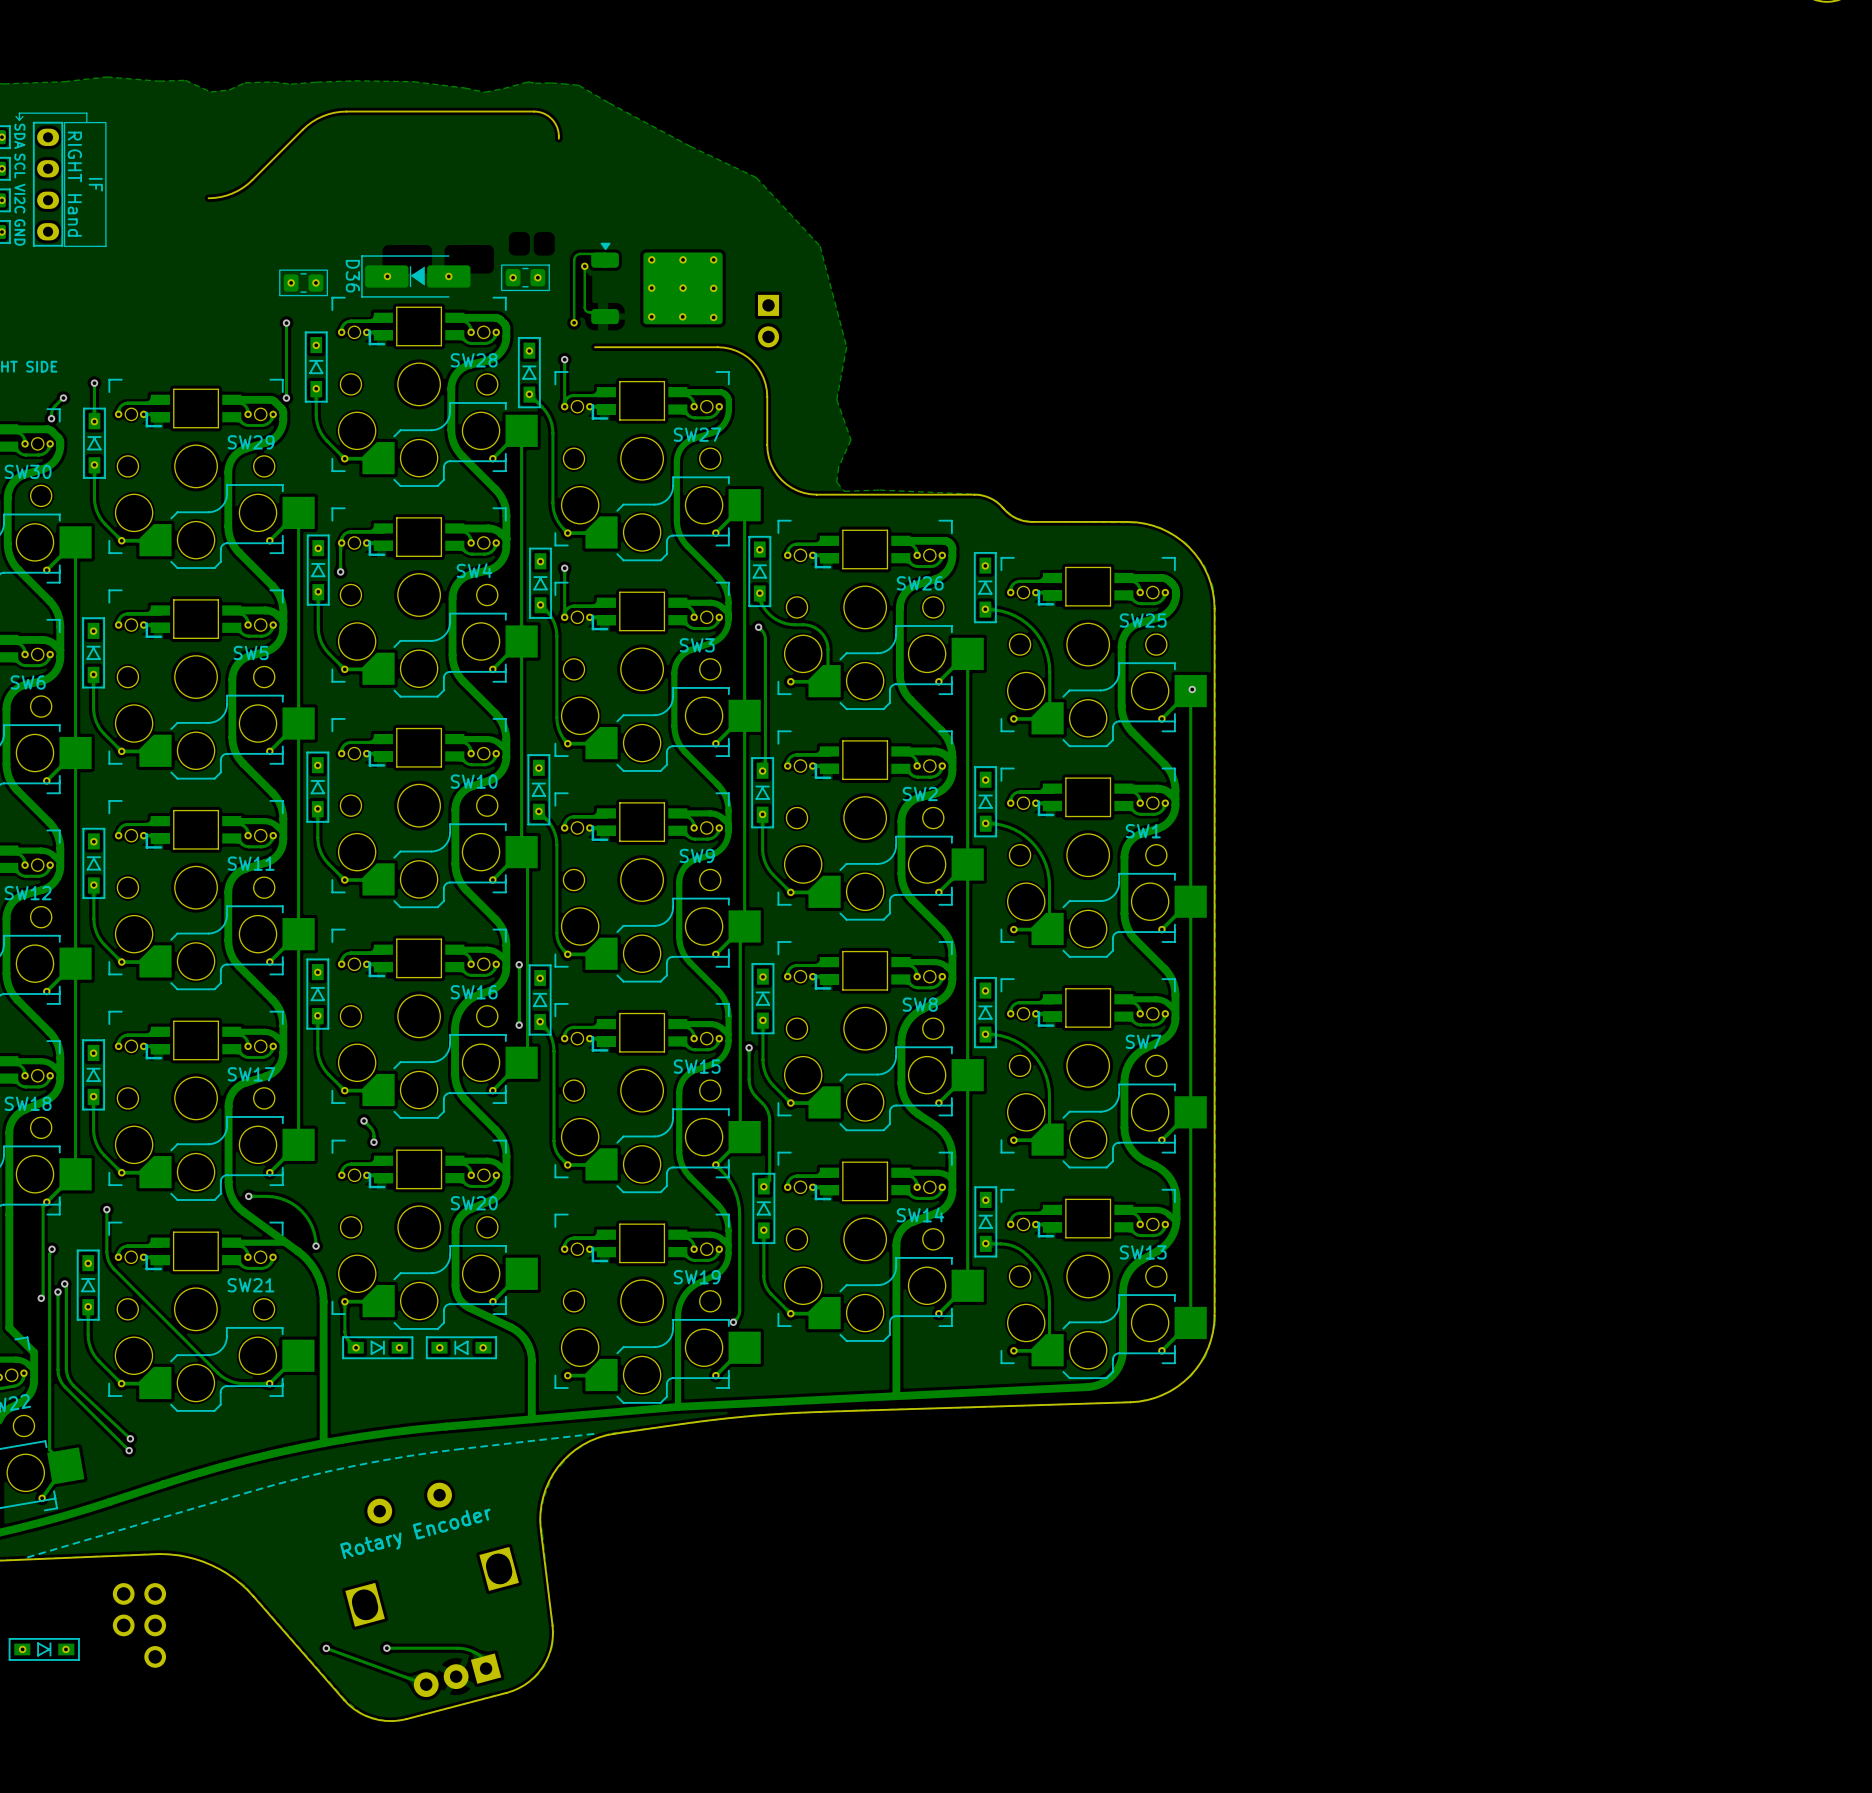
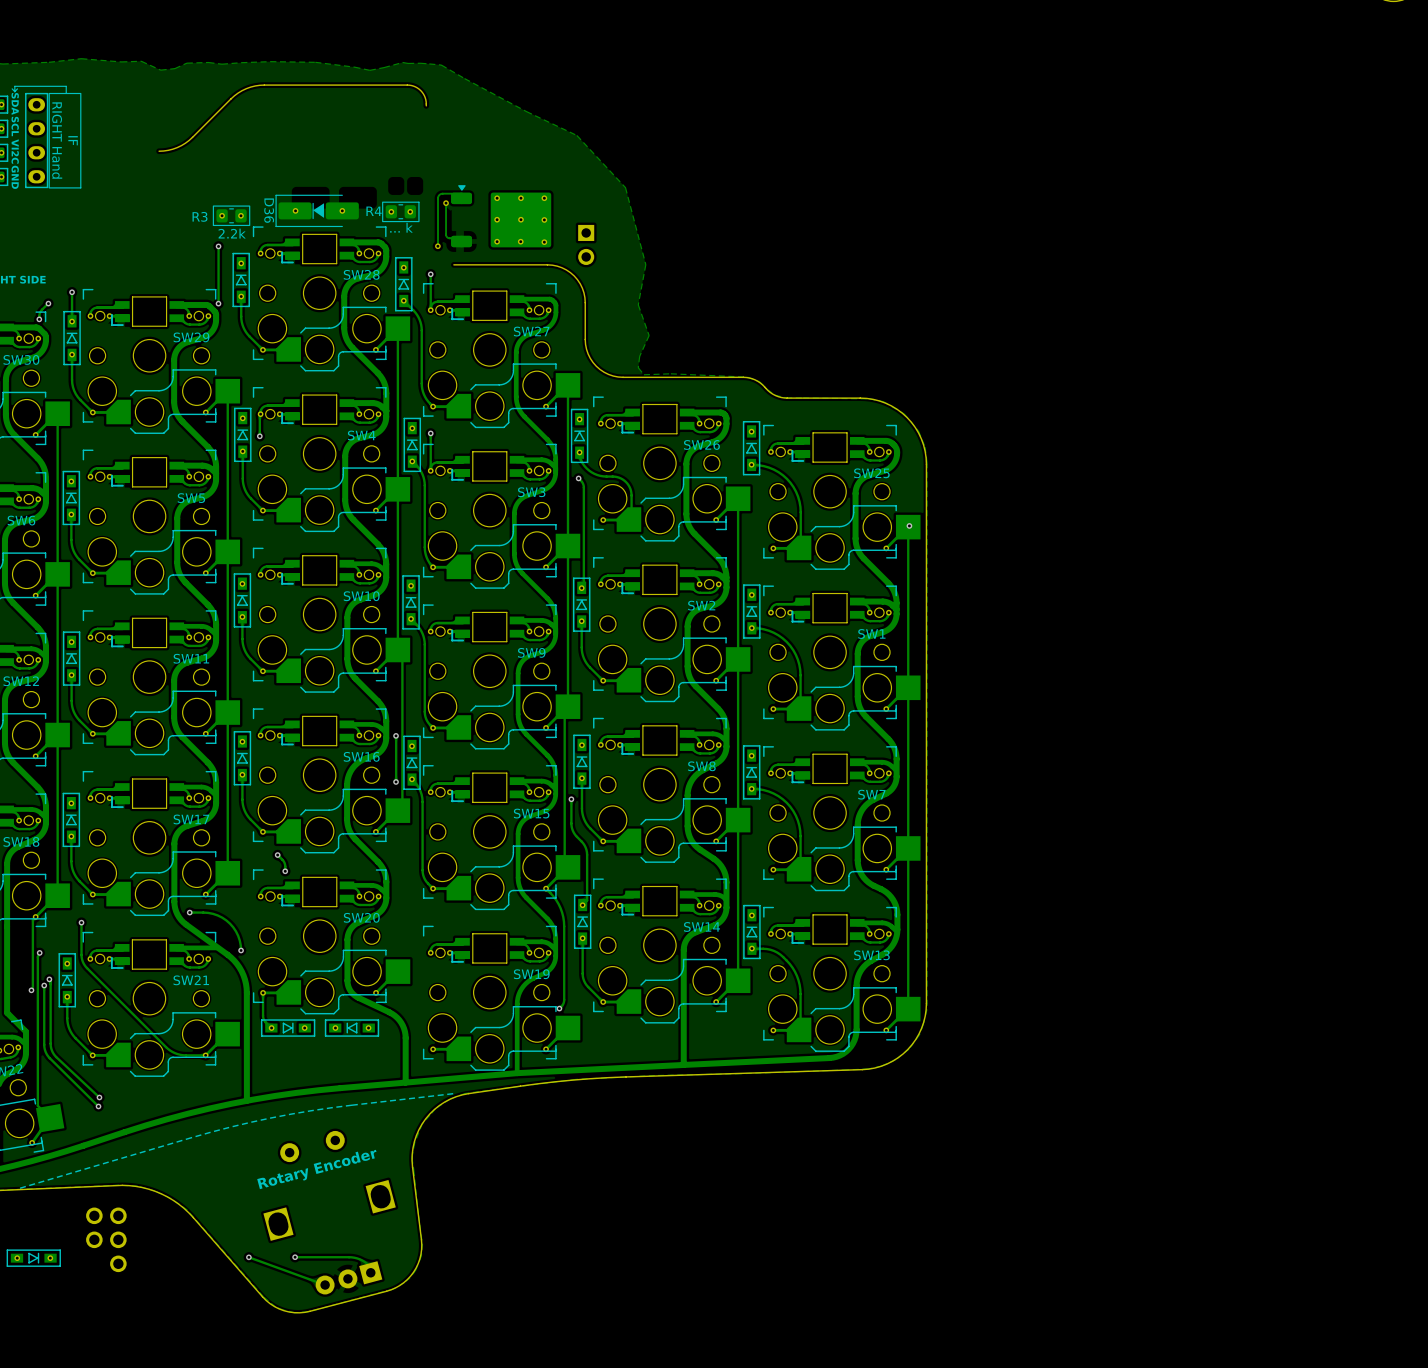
part text: none -> R4 (374, 211)
part text: none -> R3 (200, 216)
part text: none -> ... k (401, 227)
part text: none -> 2.2k (232, 233)

